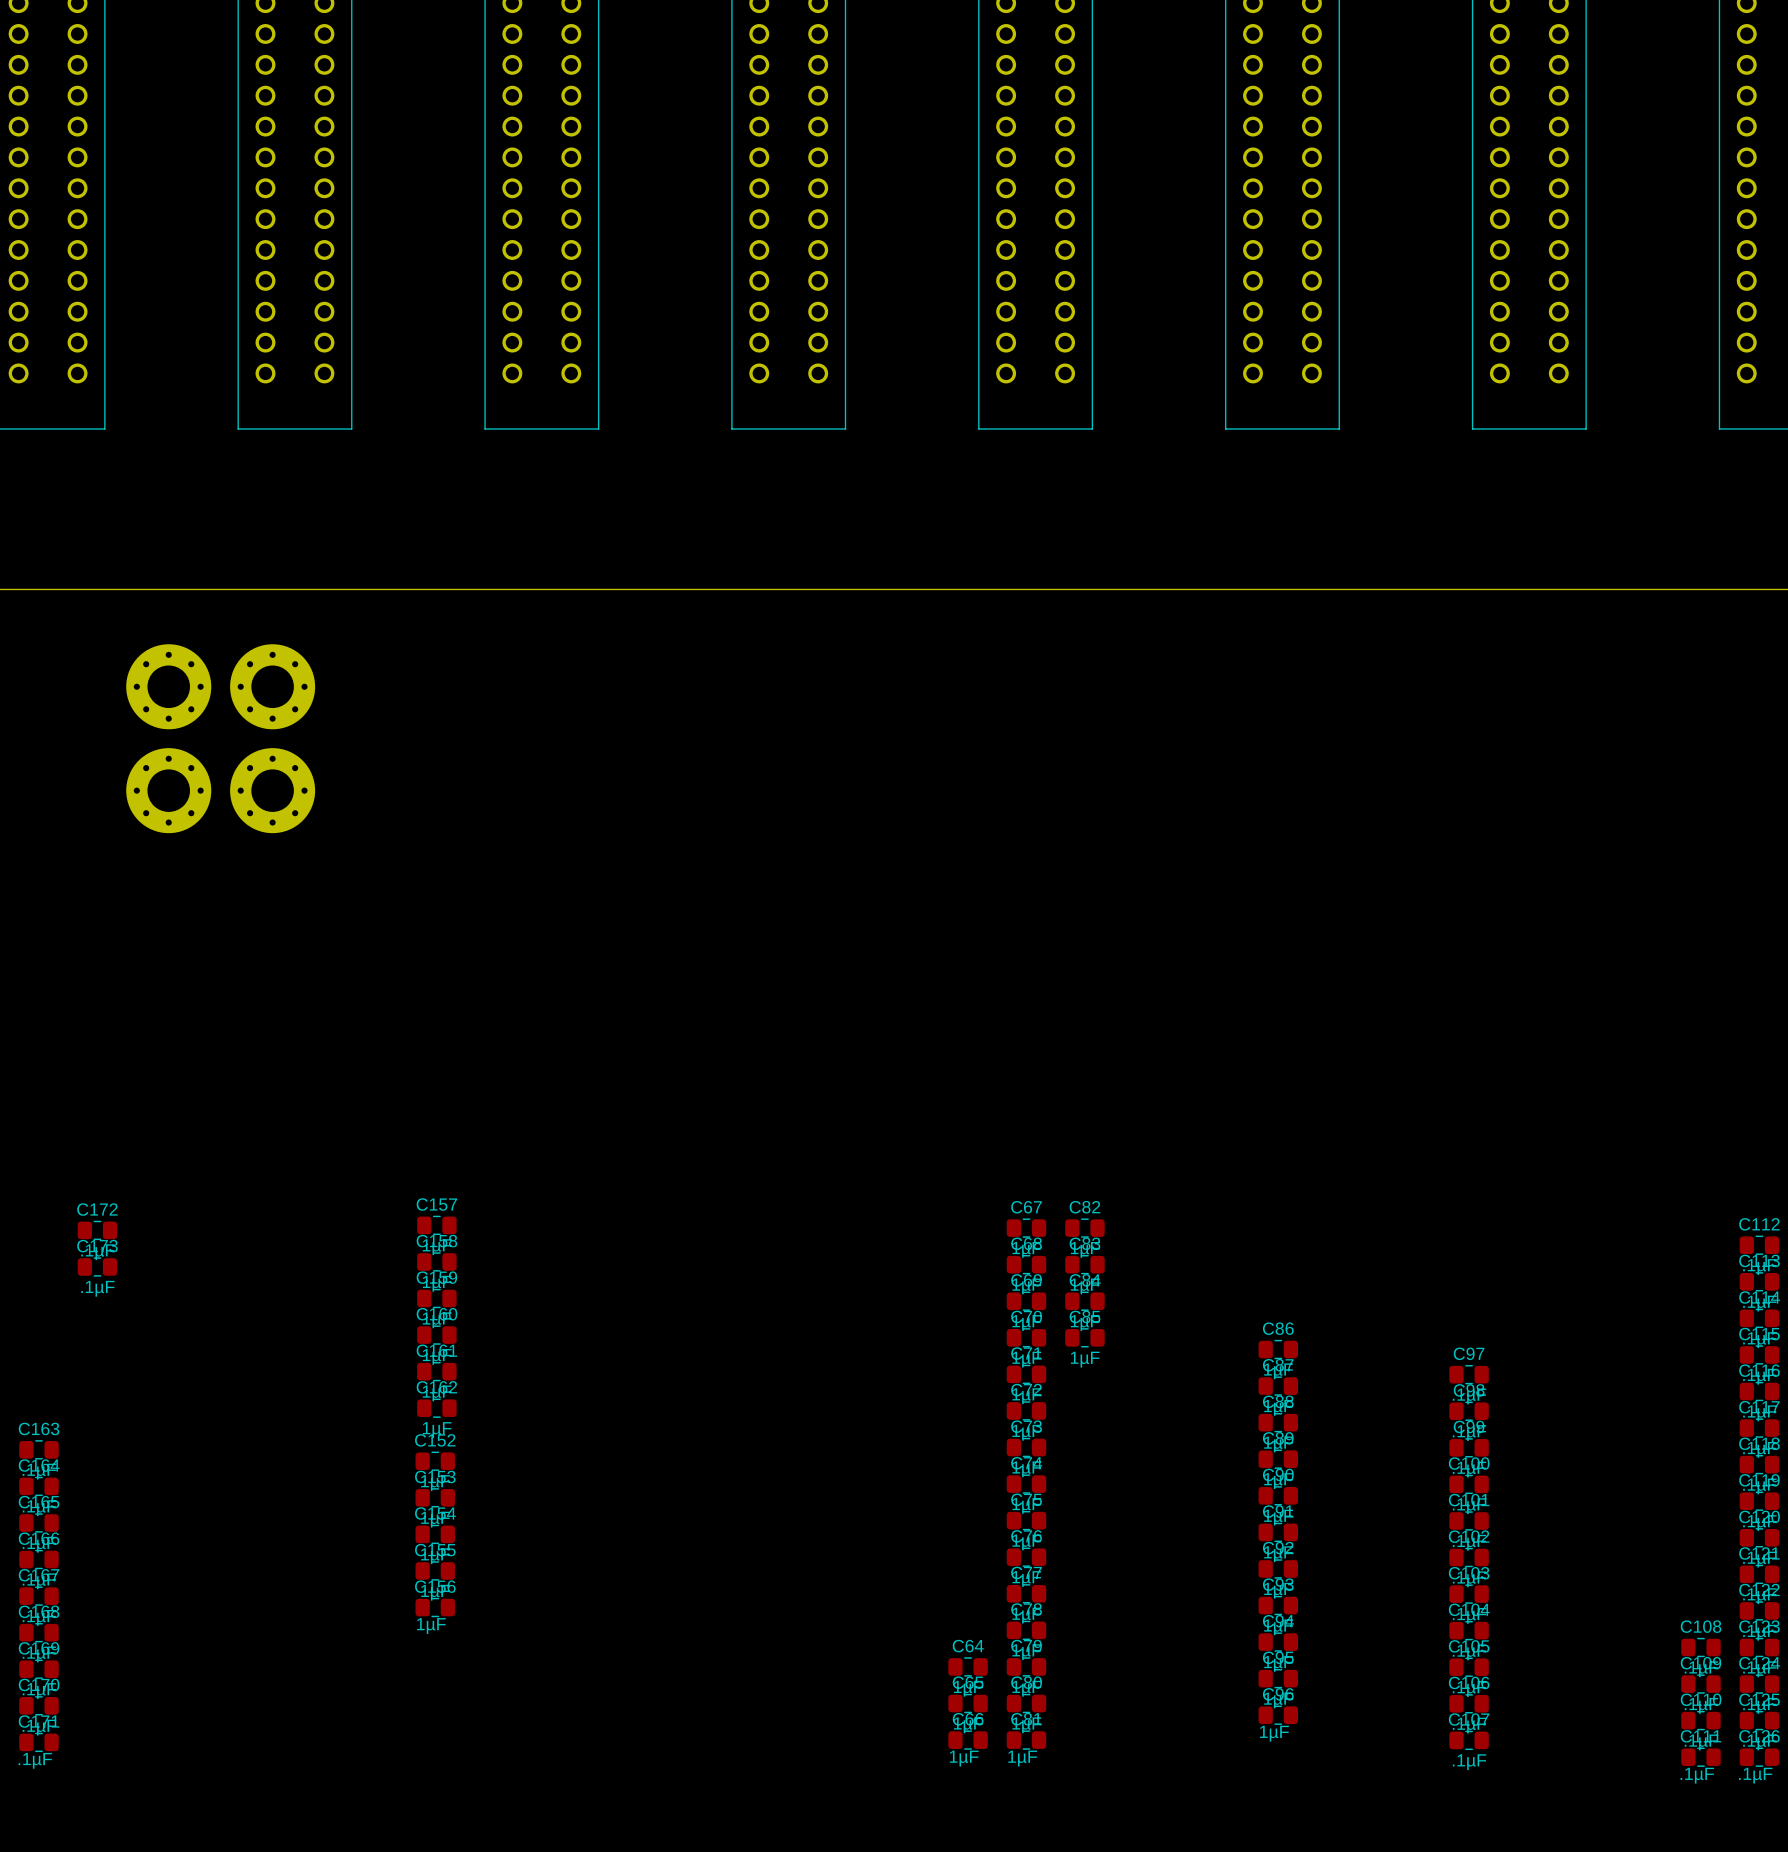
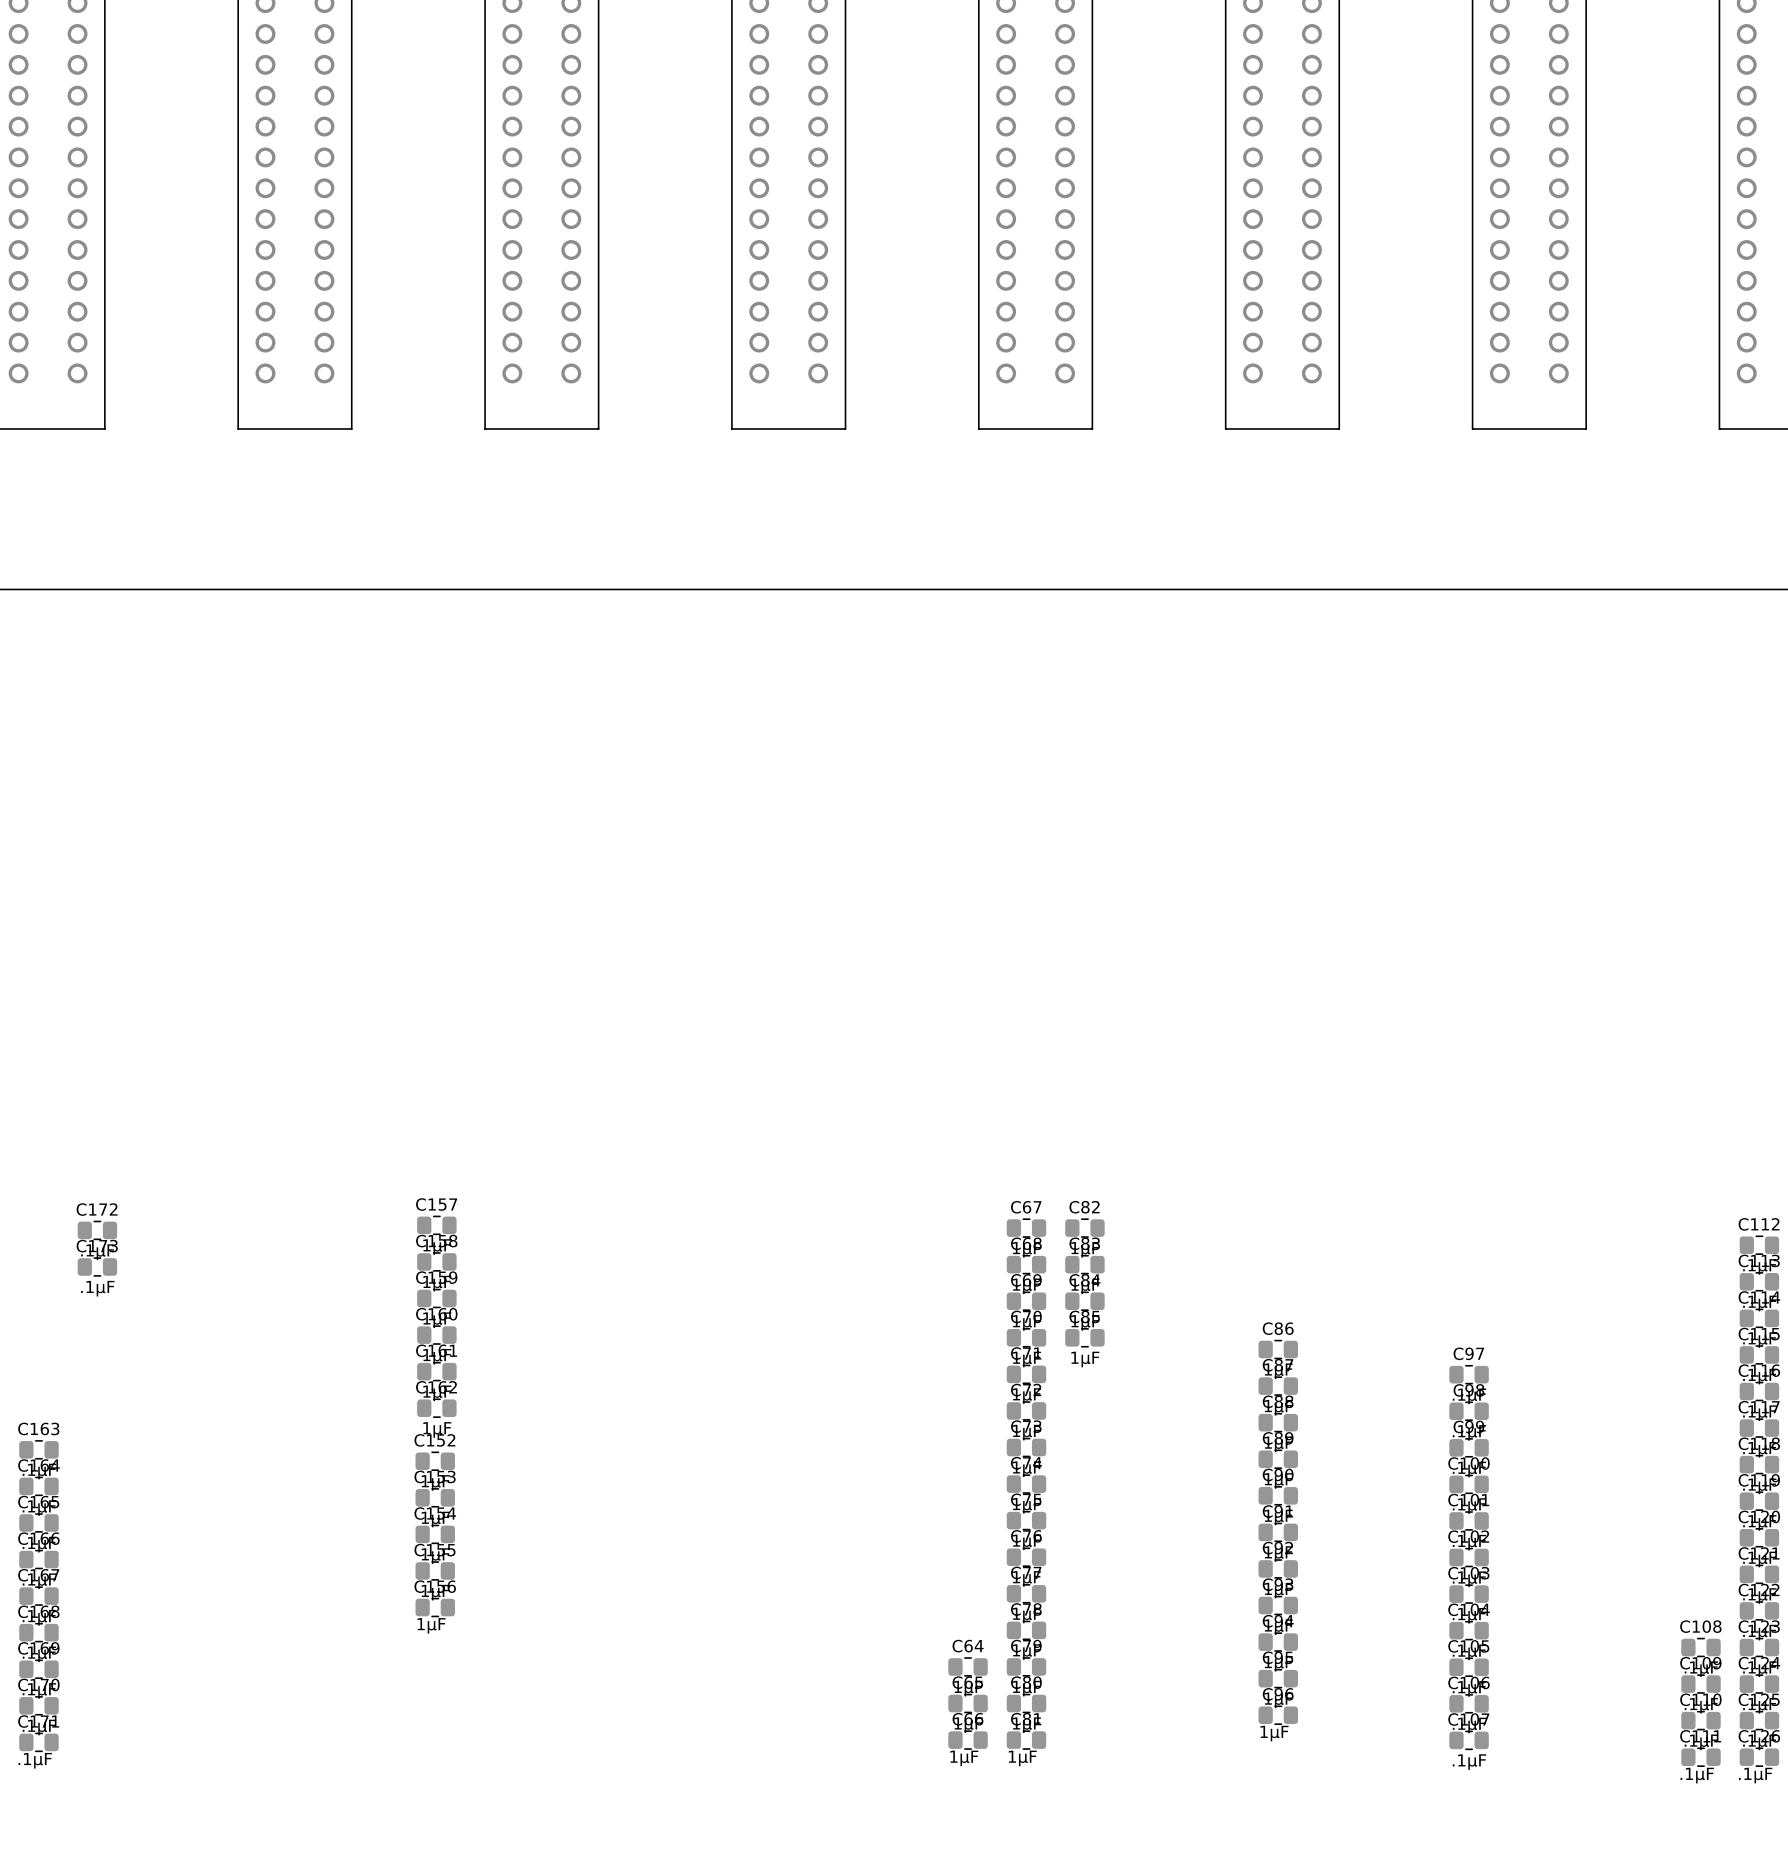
part: (168, 686) -> none
part: (272, 686) -> none
part: (168, 790) -> none
part: (272, 790) -> none

